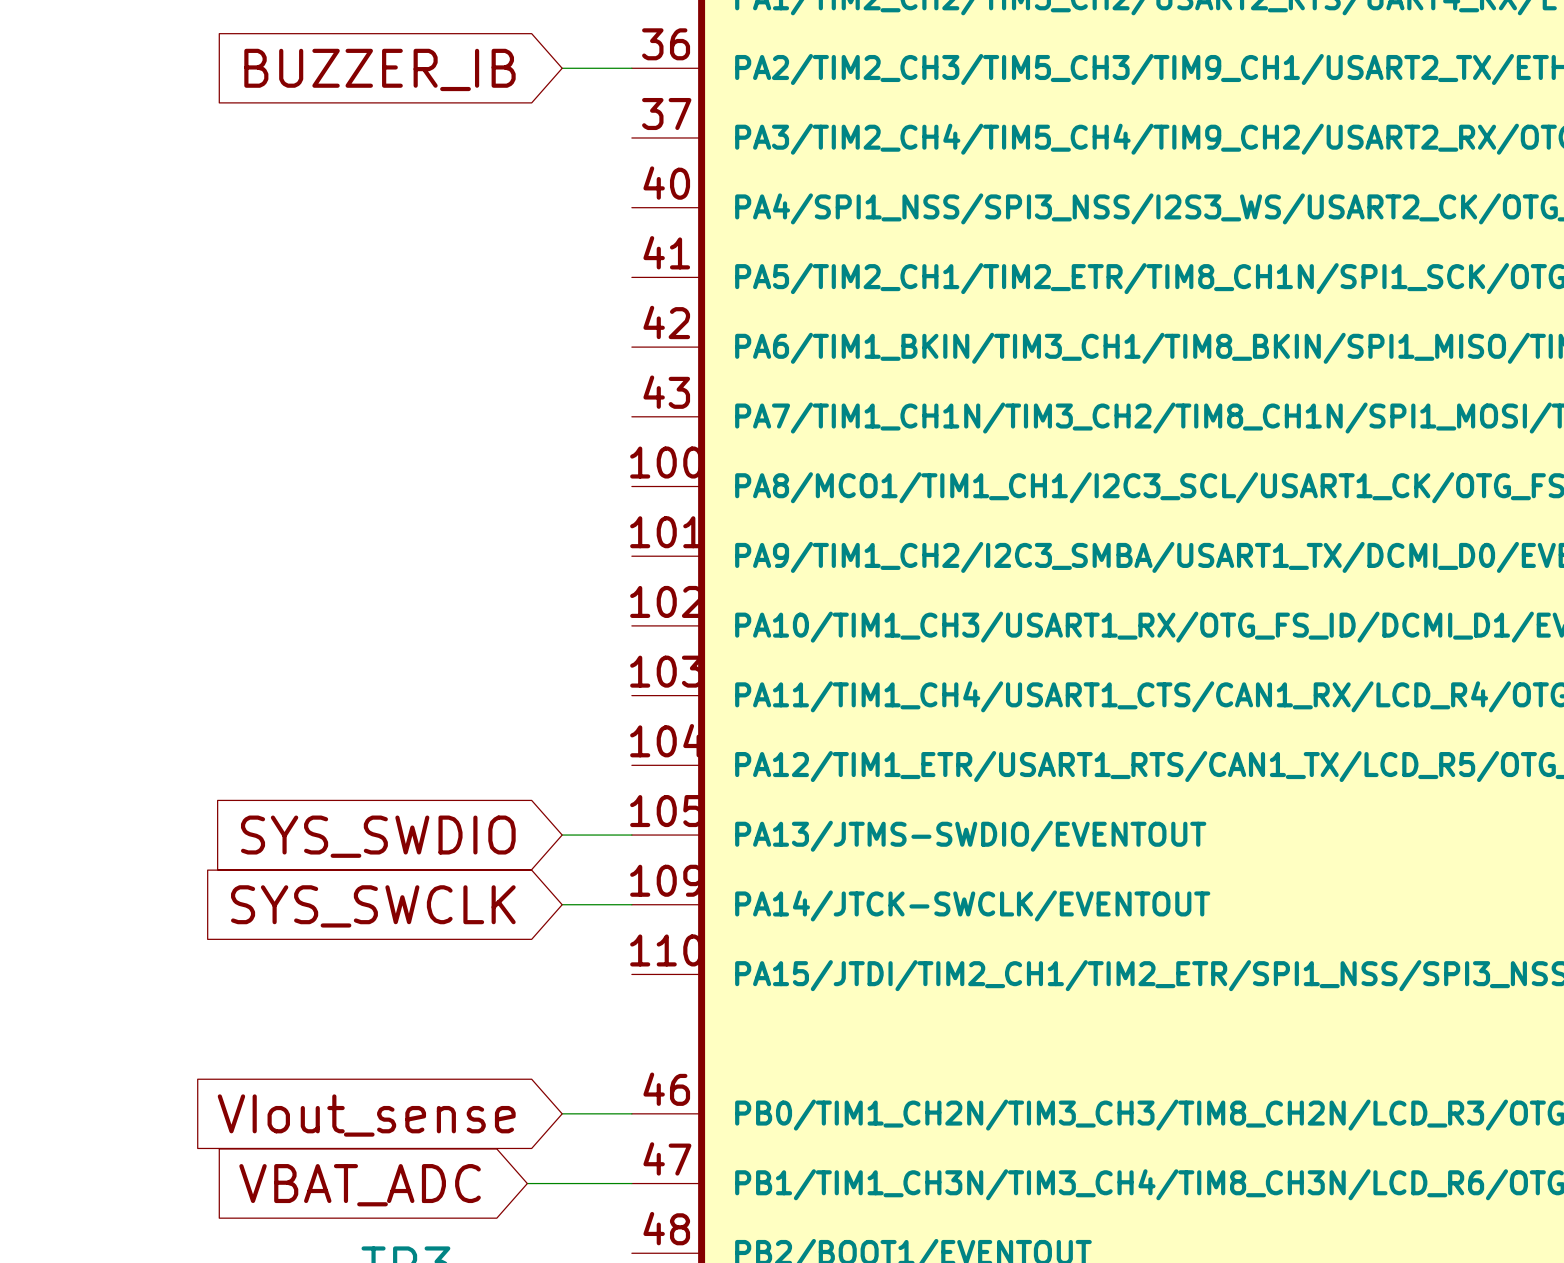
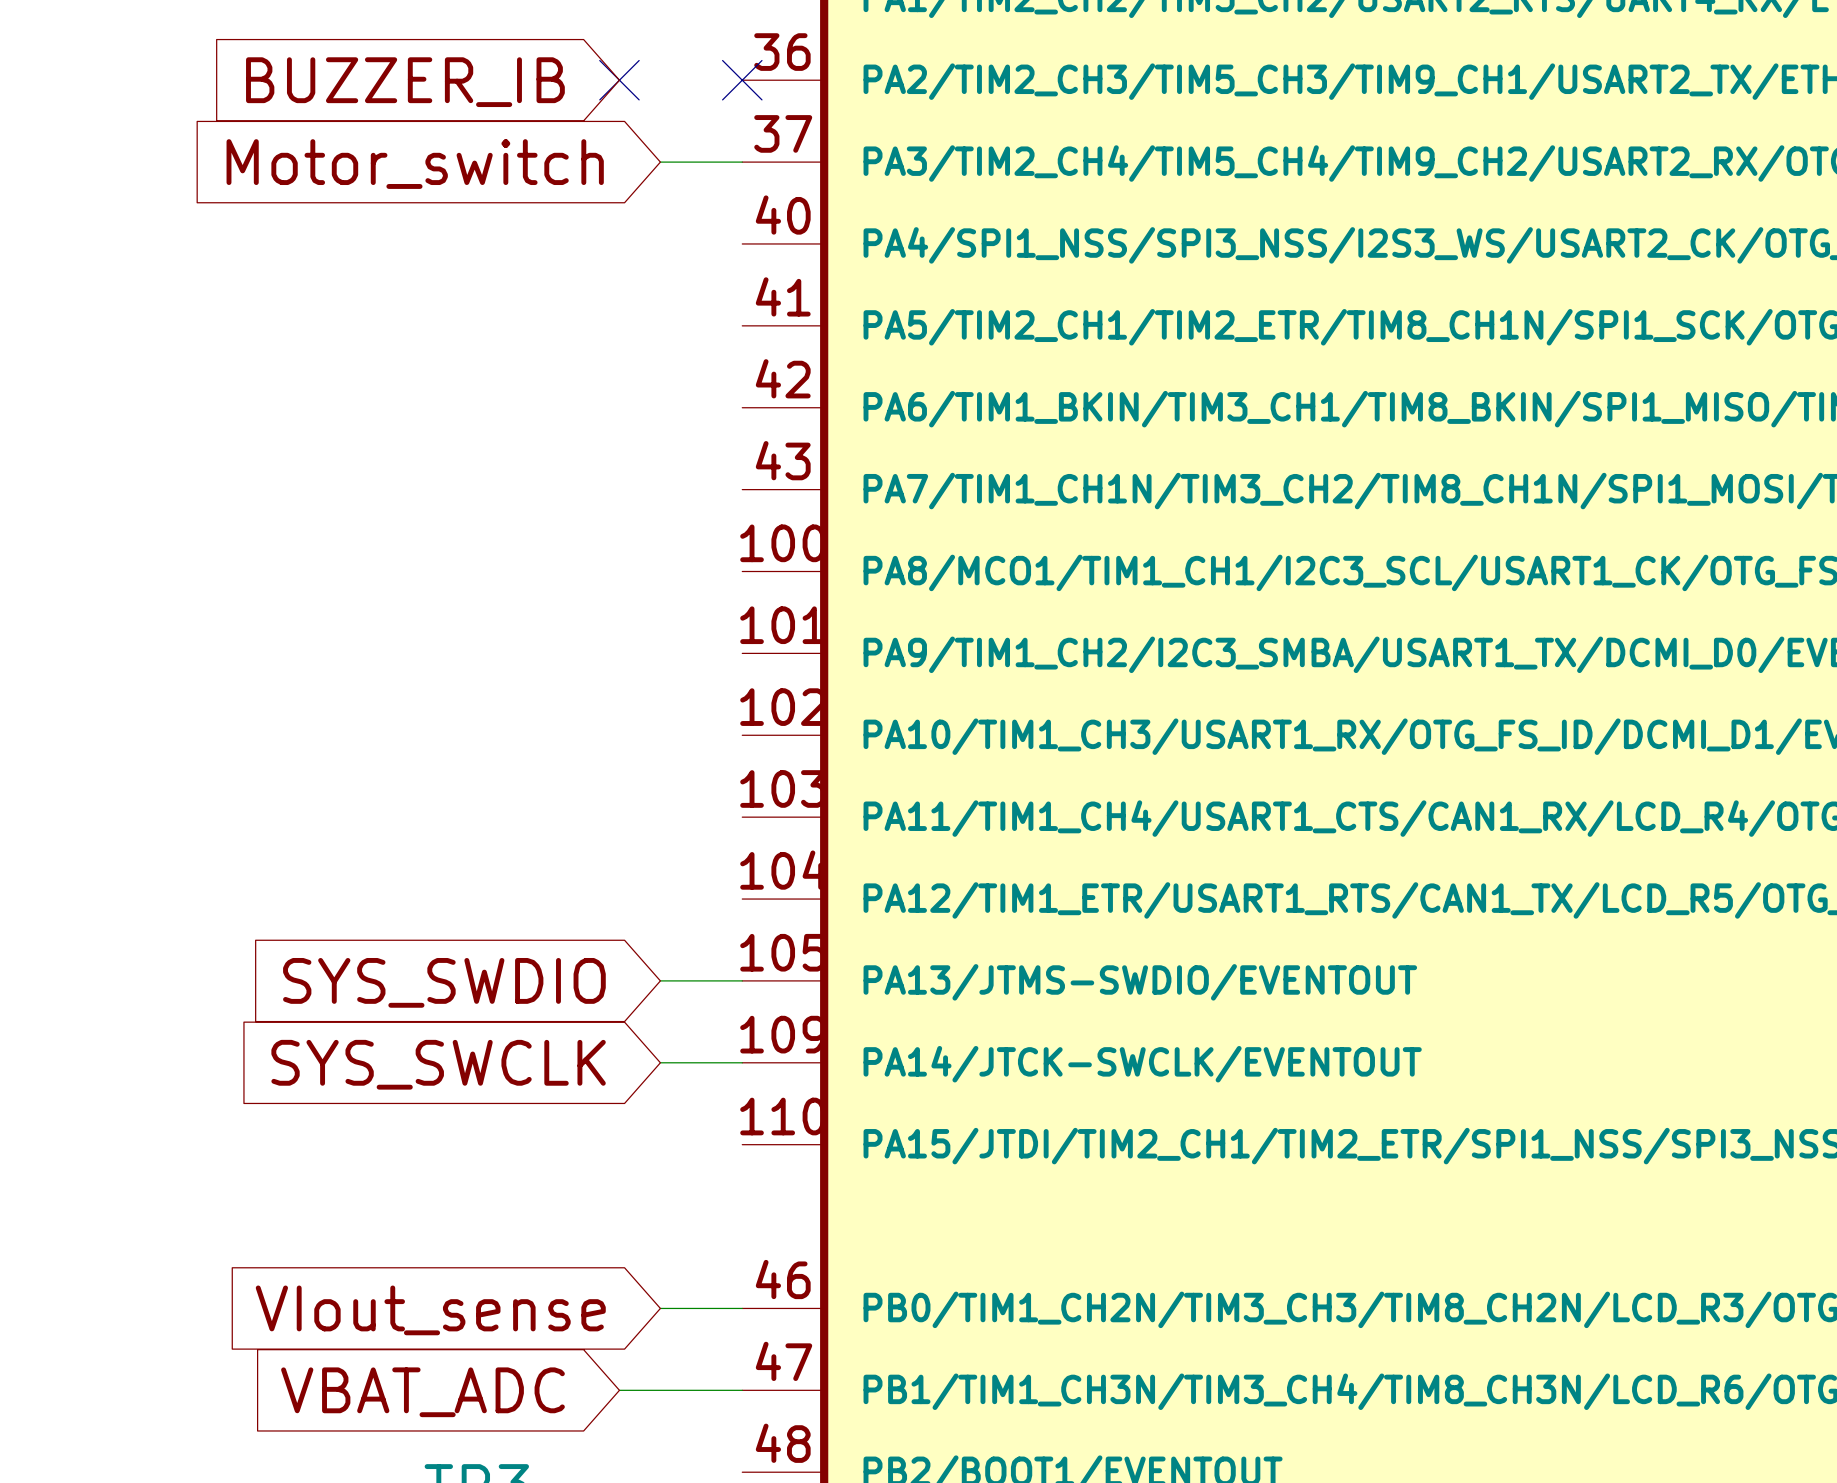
no-connect mark: none -> (619, 80)
wire: (562, 68) (631, 68) -> (660, 162) (742, 162)
no-connect mark: none -> (742, 80)
global label position: BUZZER_IB (379, 69) -> BUZZER_IB (405, 82)
global label: none -> Motor_switch (415, 164)

